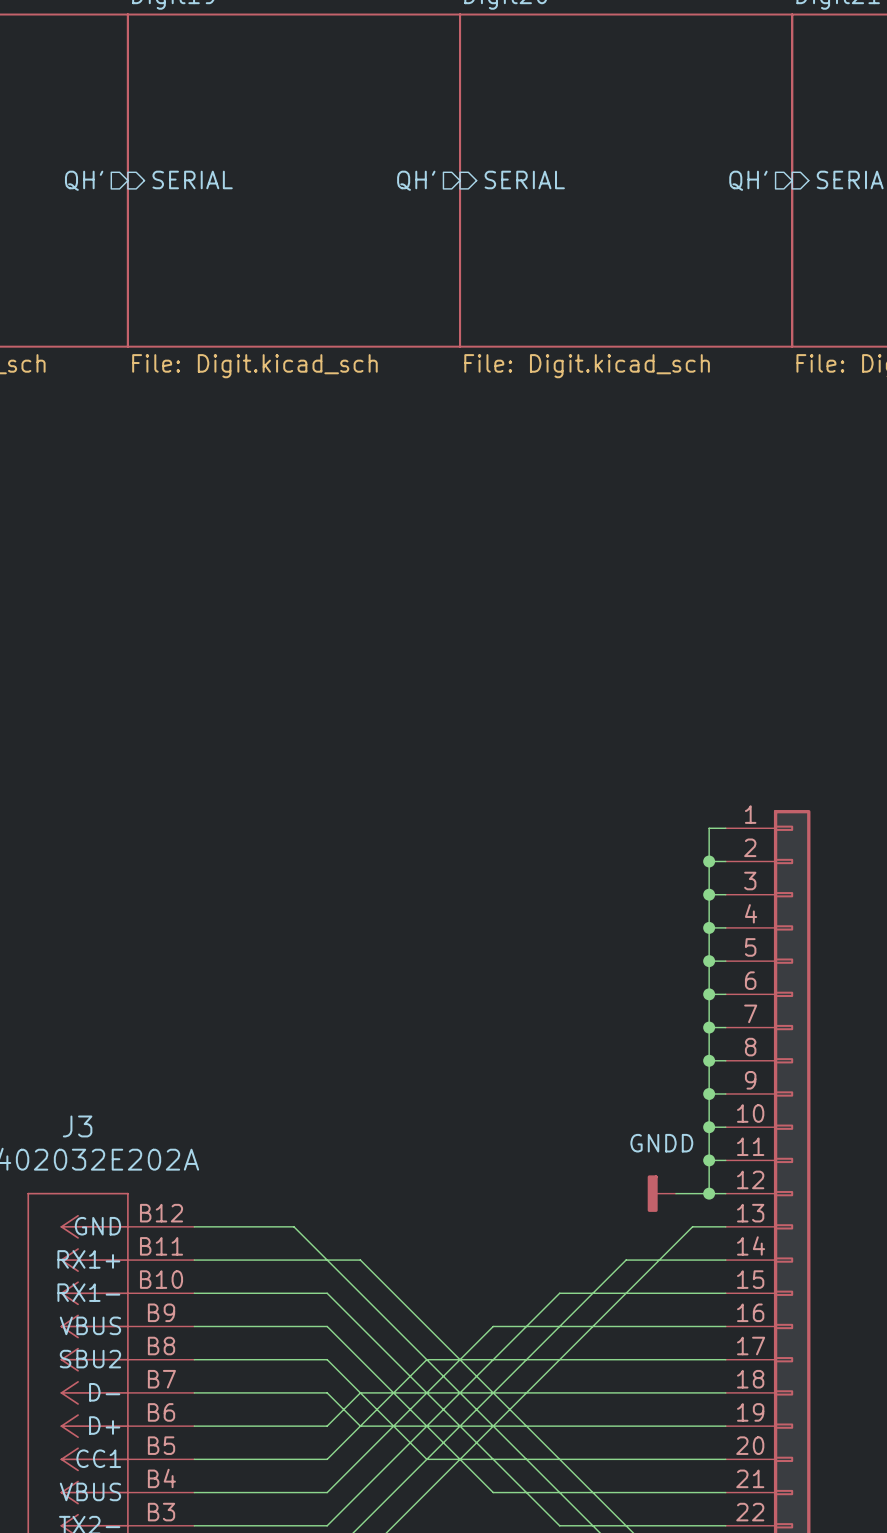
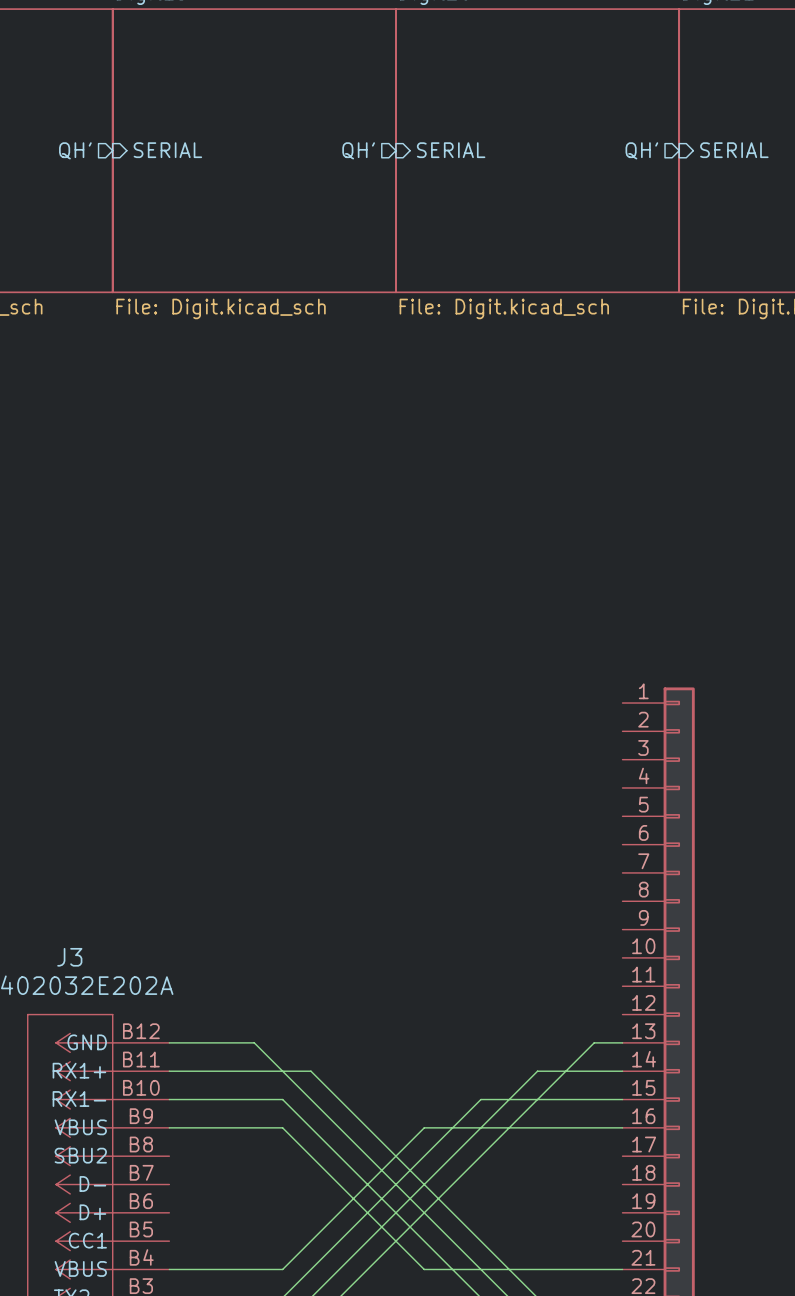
wire: (725, 828) (709, 828) (709, 1193) -> none
wire: (709, 861) (725, 861) -> none
junction: (709, 861) -> none
wire: (709, 894) (725, 894) -> none
junction: (709, 894) -> none
wire: (709, 927) (725, 927) -> none
junction: (709, 927) -> none
wire: (709, 961) (725, 961) -> none
junction: (709, 961) -> none
wire: (709, 994) (725, 994) -> none
junction: (709, 994) -> none
wire: (709, 1027) (725, 1027) -> none
junction: (709, 1027) -> none
wire: (709, 1060) (725, 1060) -> none
junction: (709, 1060) -> none
wire: (709, 1093) (725, 1093) -> none
junction: (709, 1093) -> none
wire: (709, 1127) (725, 1127) -> none
junction: (709, 1127) -> none
wire: (709, 1160) (725, 1160) -> none
junction: (709, 1160) -> none
power symbol: GNDD (661, 1193) -> none
wire: (675, 1193) (725, 1193) -> none
junction: (709, 1193) -> none
wire: (194, 1359) (327, 1359) (426, 1459) (725, 1459) -> none
wire: (725, 1359) (426, 1359) (327, 1459) (194, 1459) -> none
wire: (194, 1392) (327, 1392) (360, 1426) (725, 1426) -> none
wire: (725, 1392) (360, 1392) (327, 1426) (194, 1426) -> none

